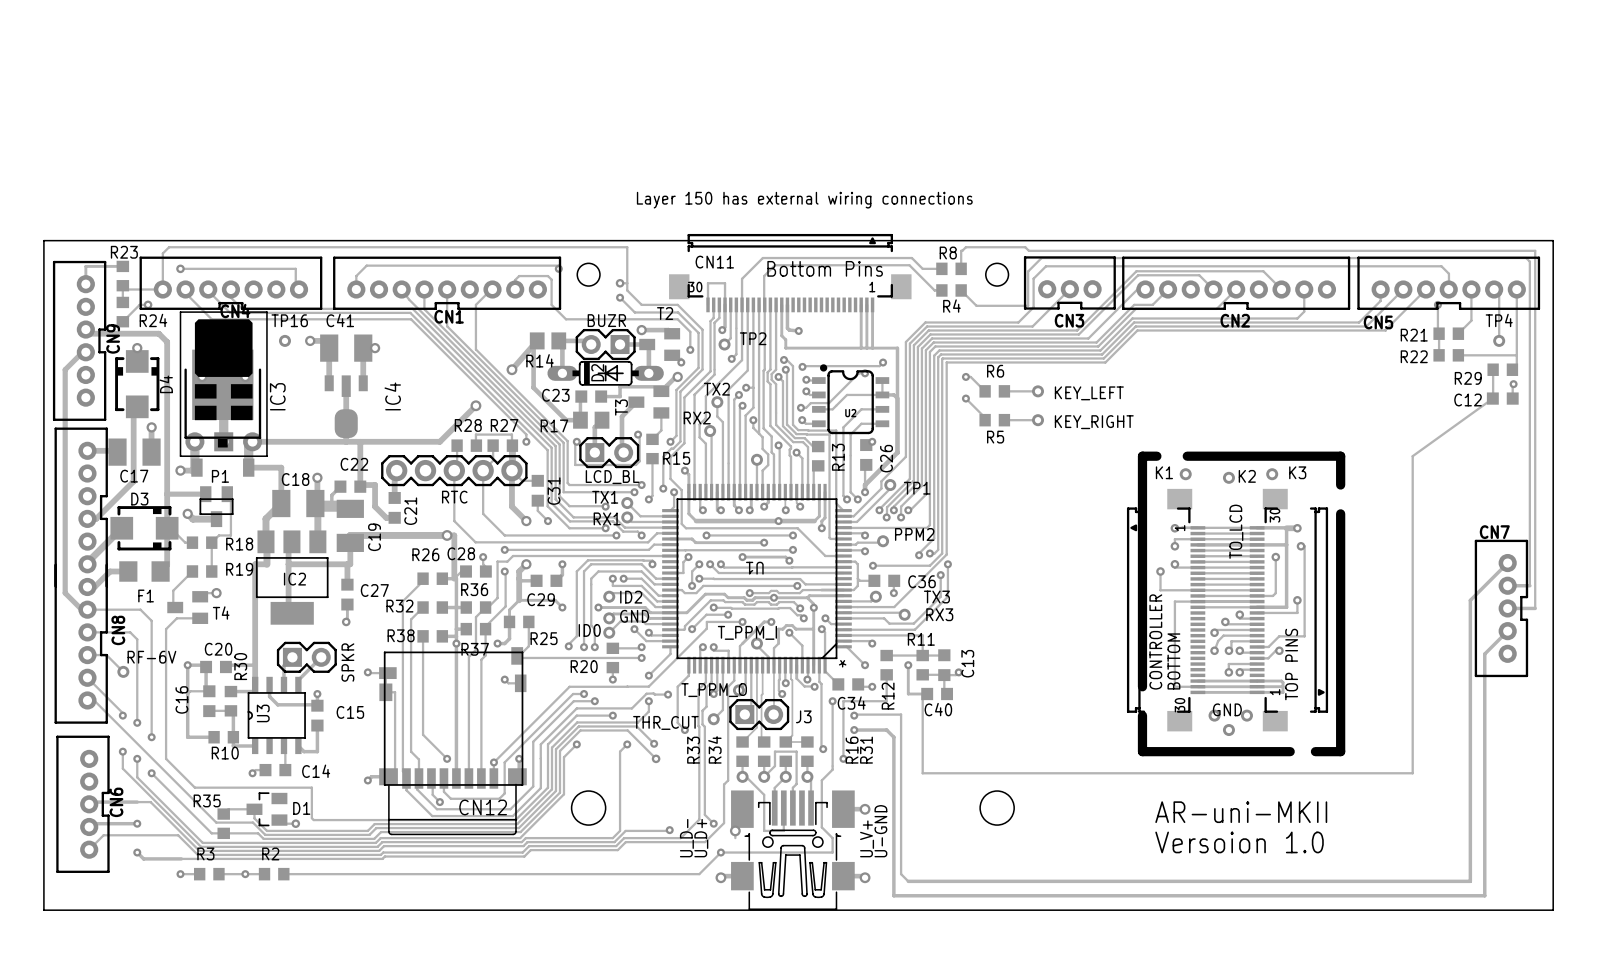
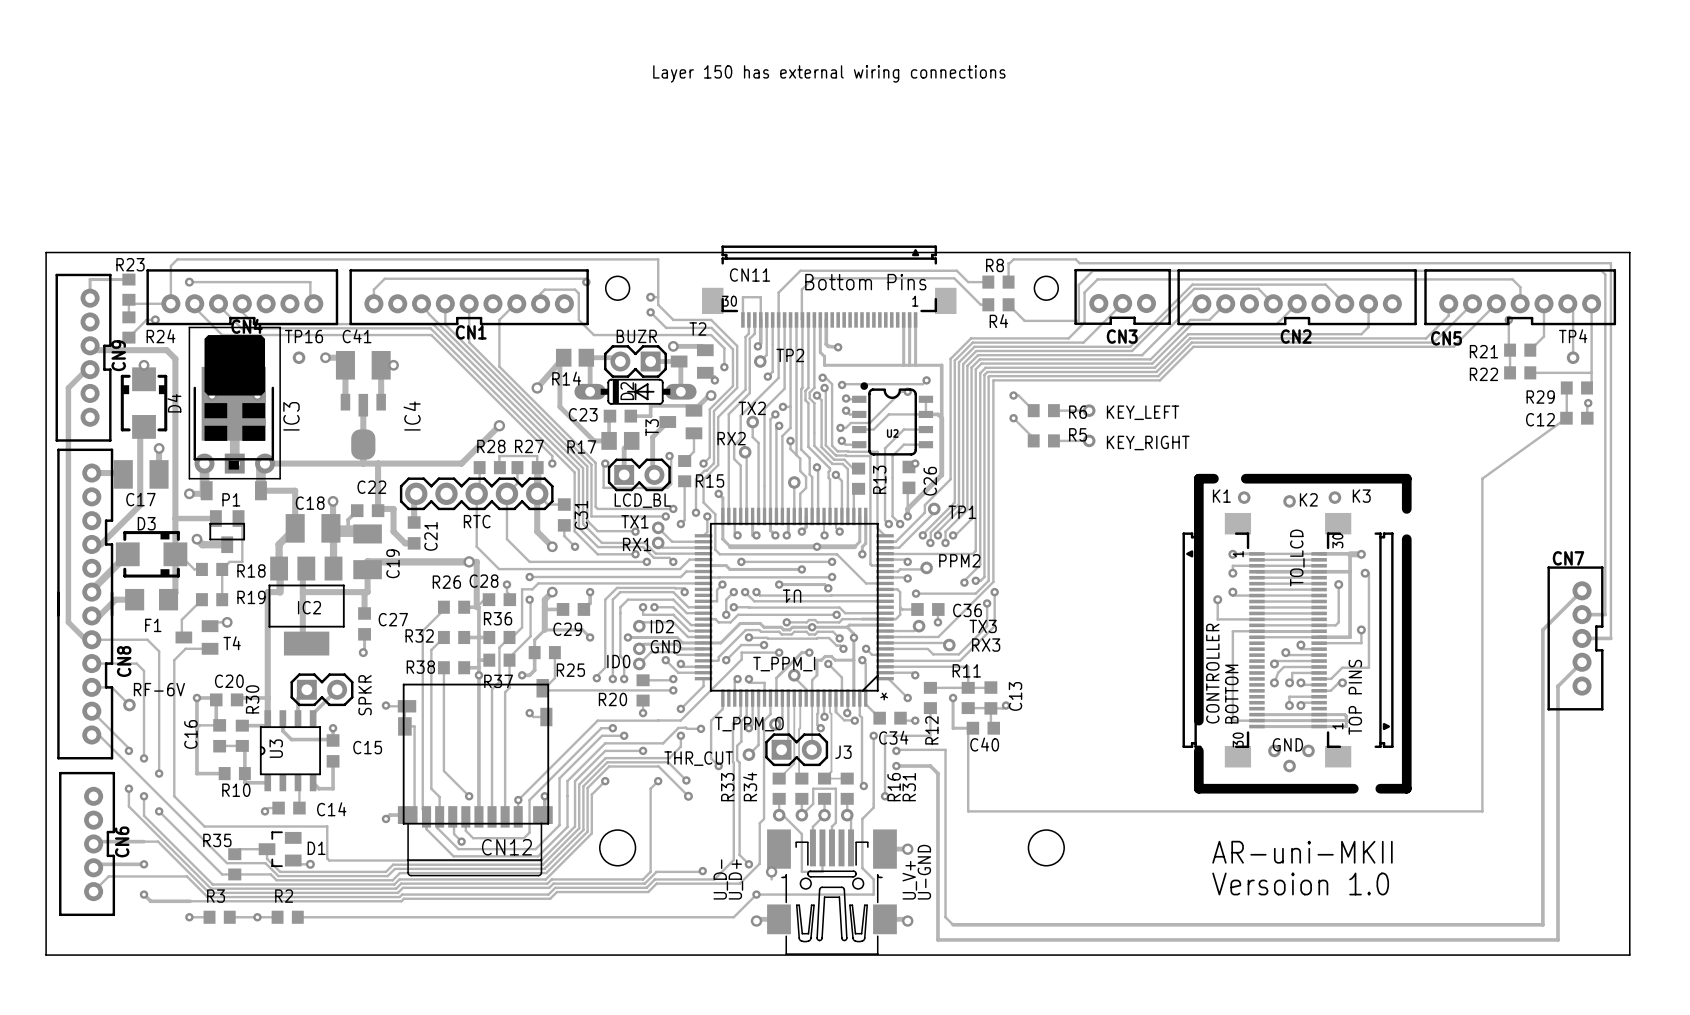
text position: Layer 150 has external wiring connections (804, 200) -> Layer 150 has external wiring connections (829, 73)
R6 name position: R6 (995, 371) -> R6 (1078, 412)
R5 name position: R5 (995, 437) -> R5 (1078, 434)

